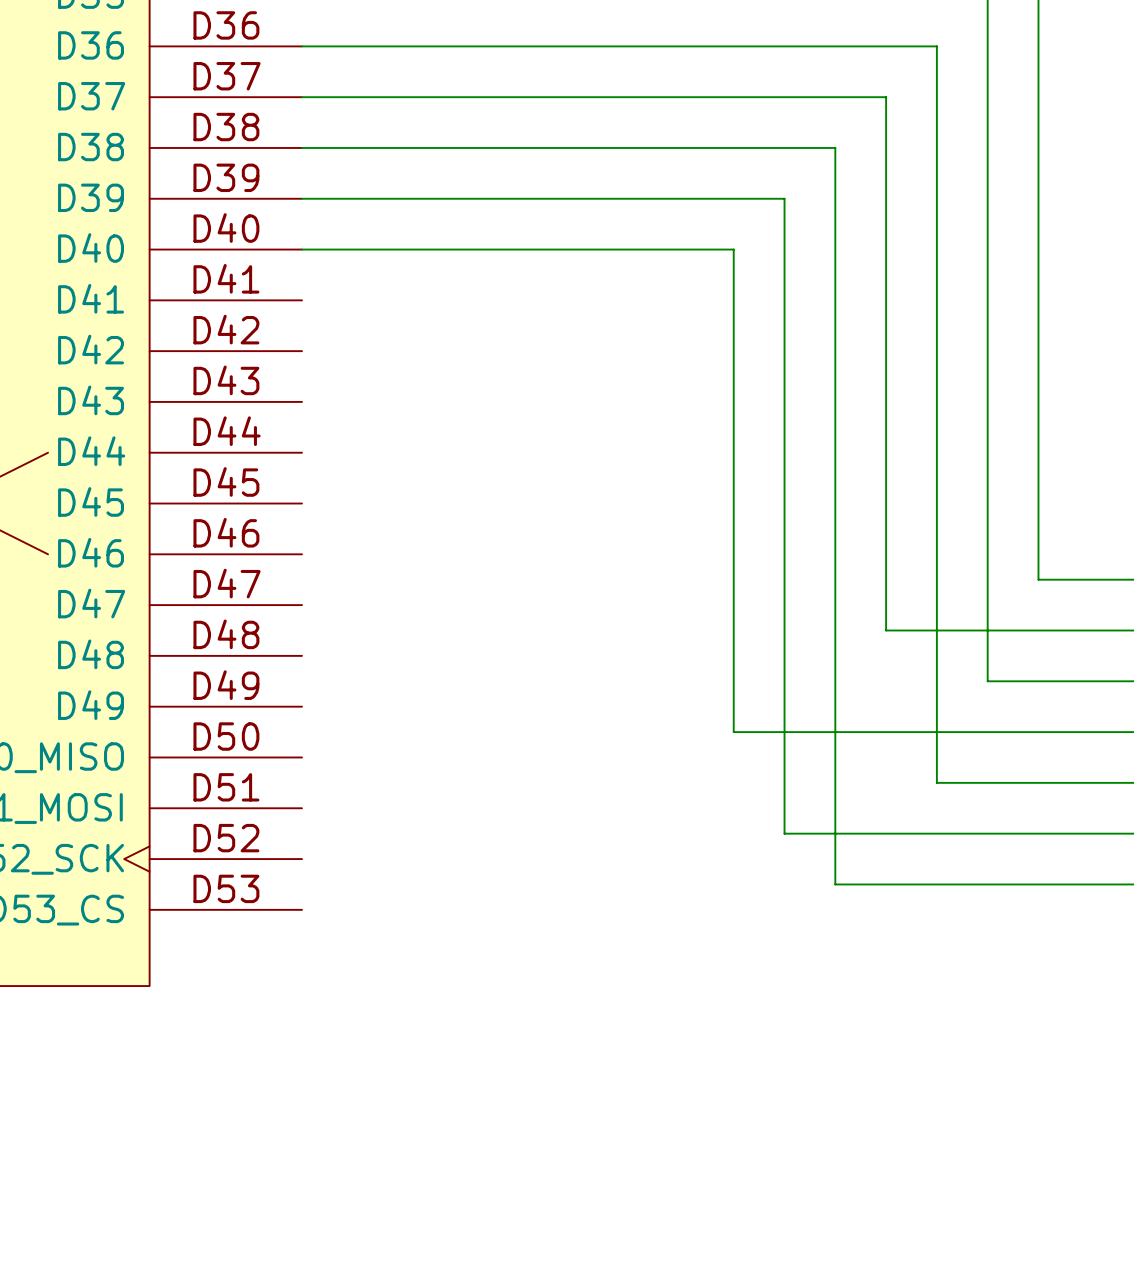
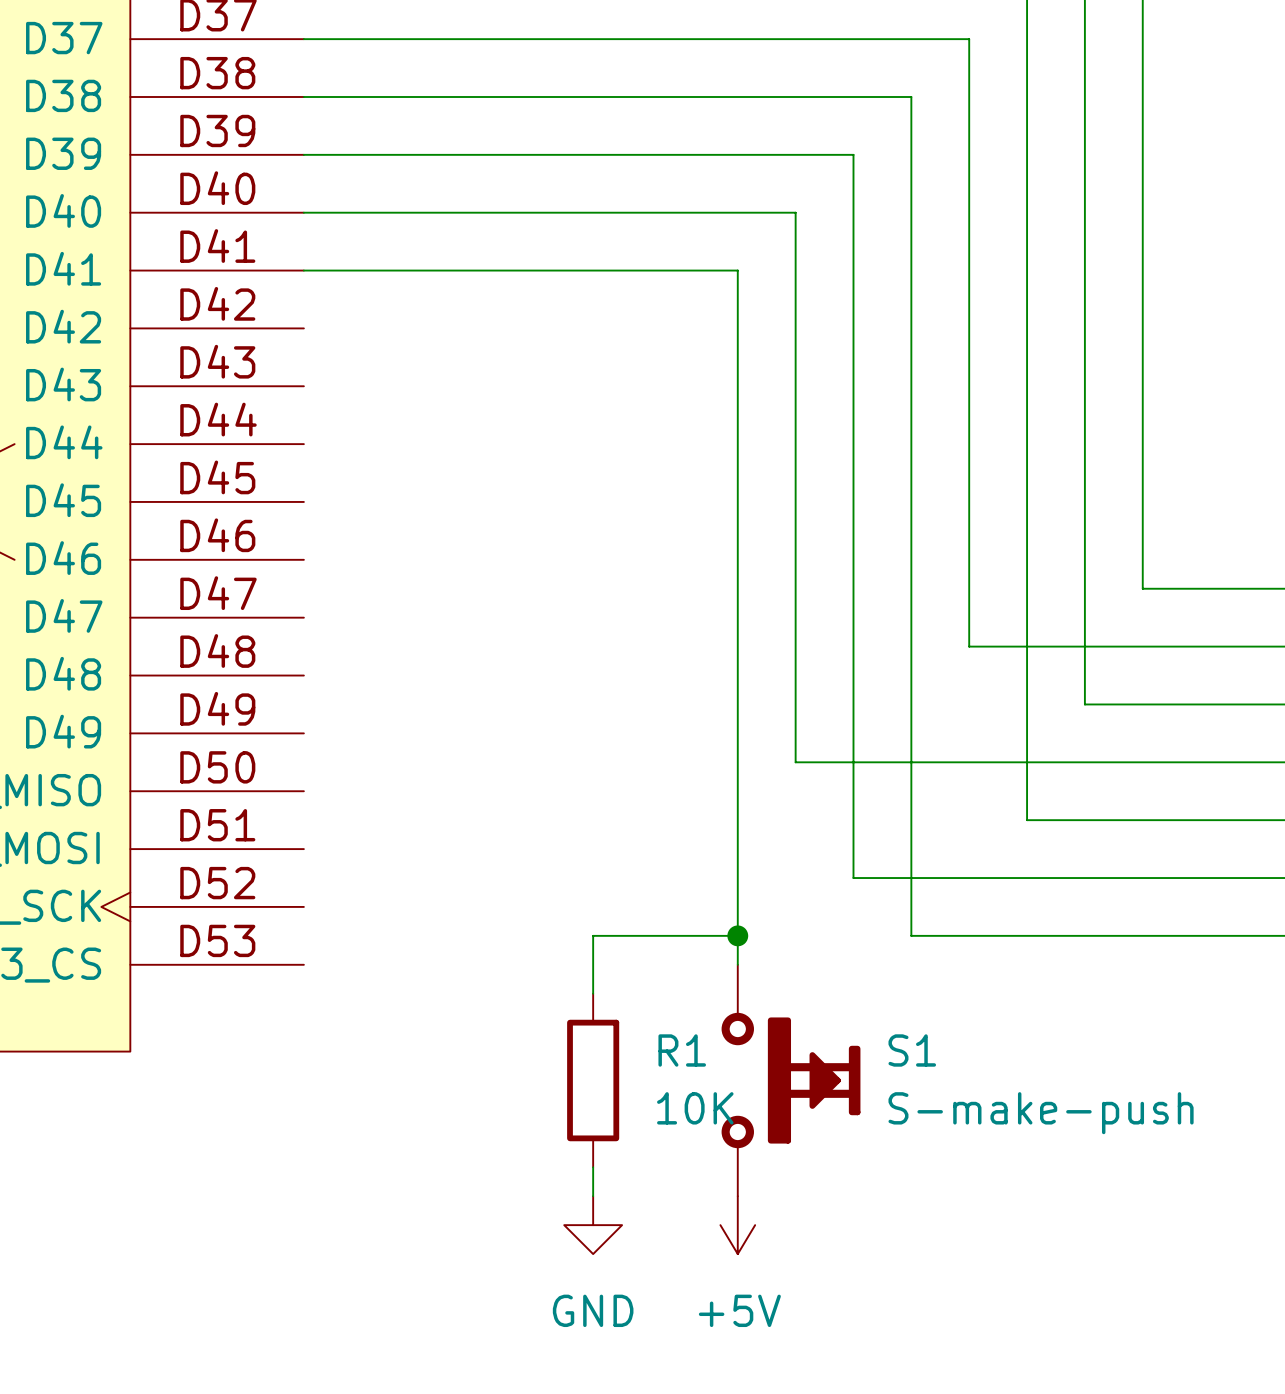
wire: none -> (303, 270) (737, 270) (737, 964)
wire: none -> (737, 935) (593, 935) (593, 993)
junction: none -> (737, 935)
R1: none -> 10K (593, 1080)
S1: none -> S-make-push (791, 1080)
wire: none -> (593, 1167) (593, 1196)
power symbol: none -> GND (593, 1225)
power symbol: none -> +5V (737, 1225)

